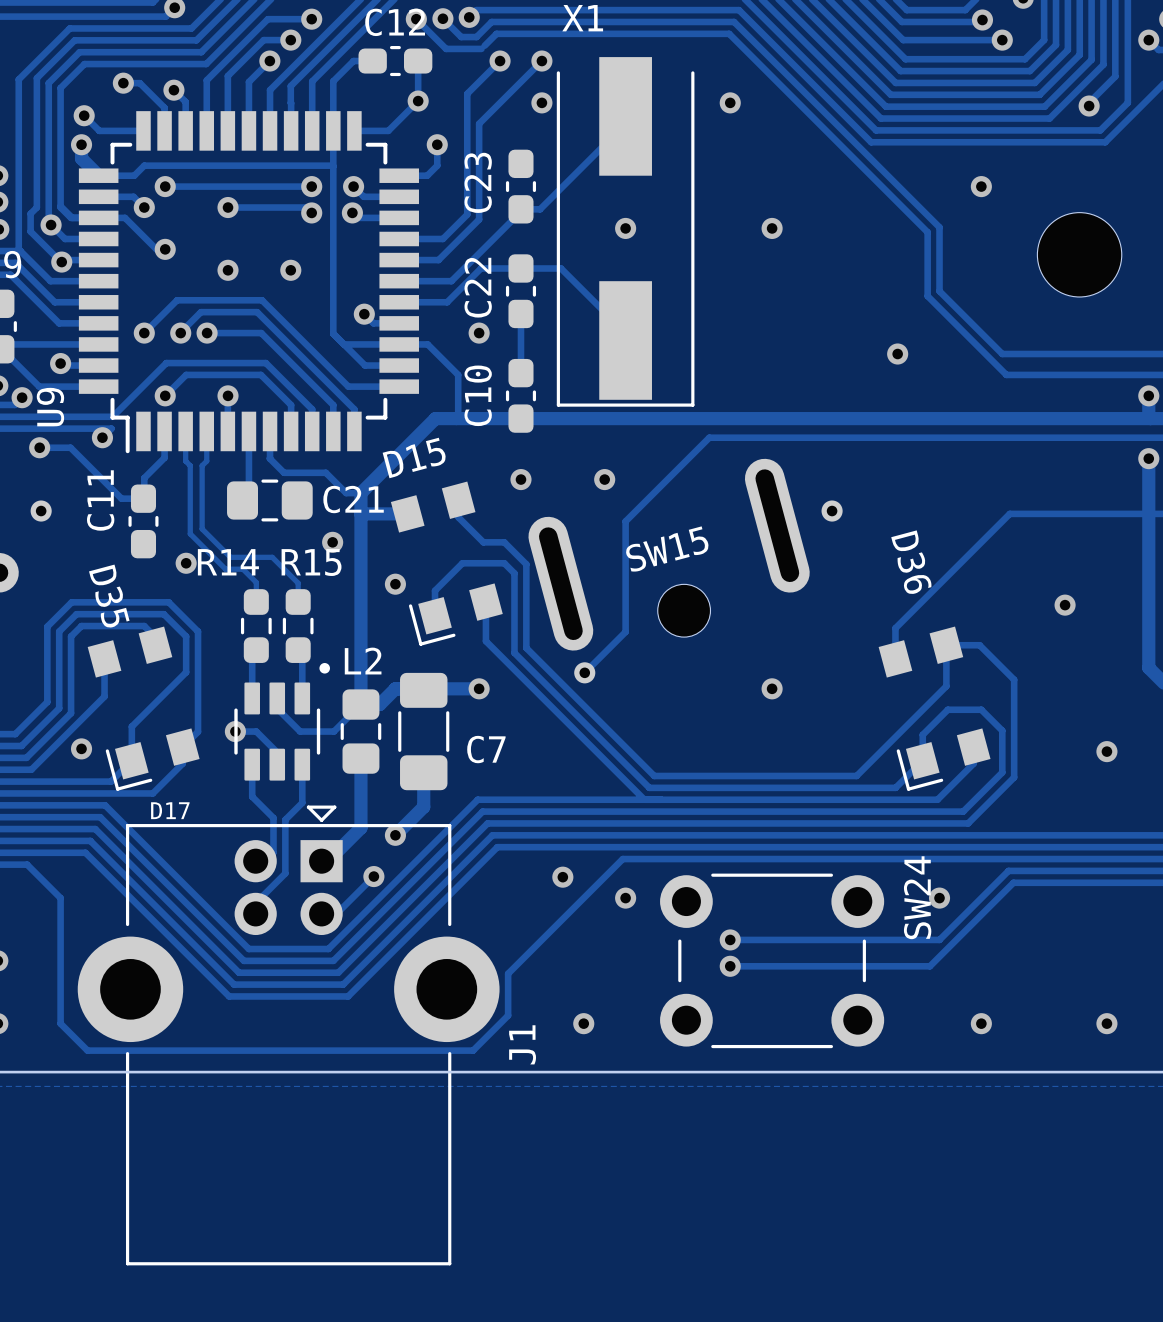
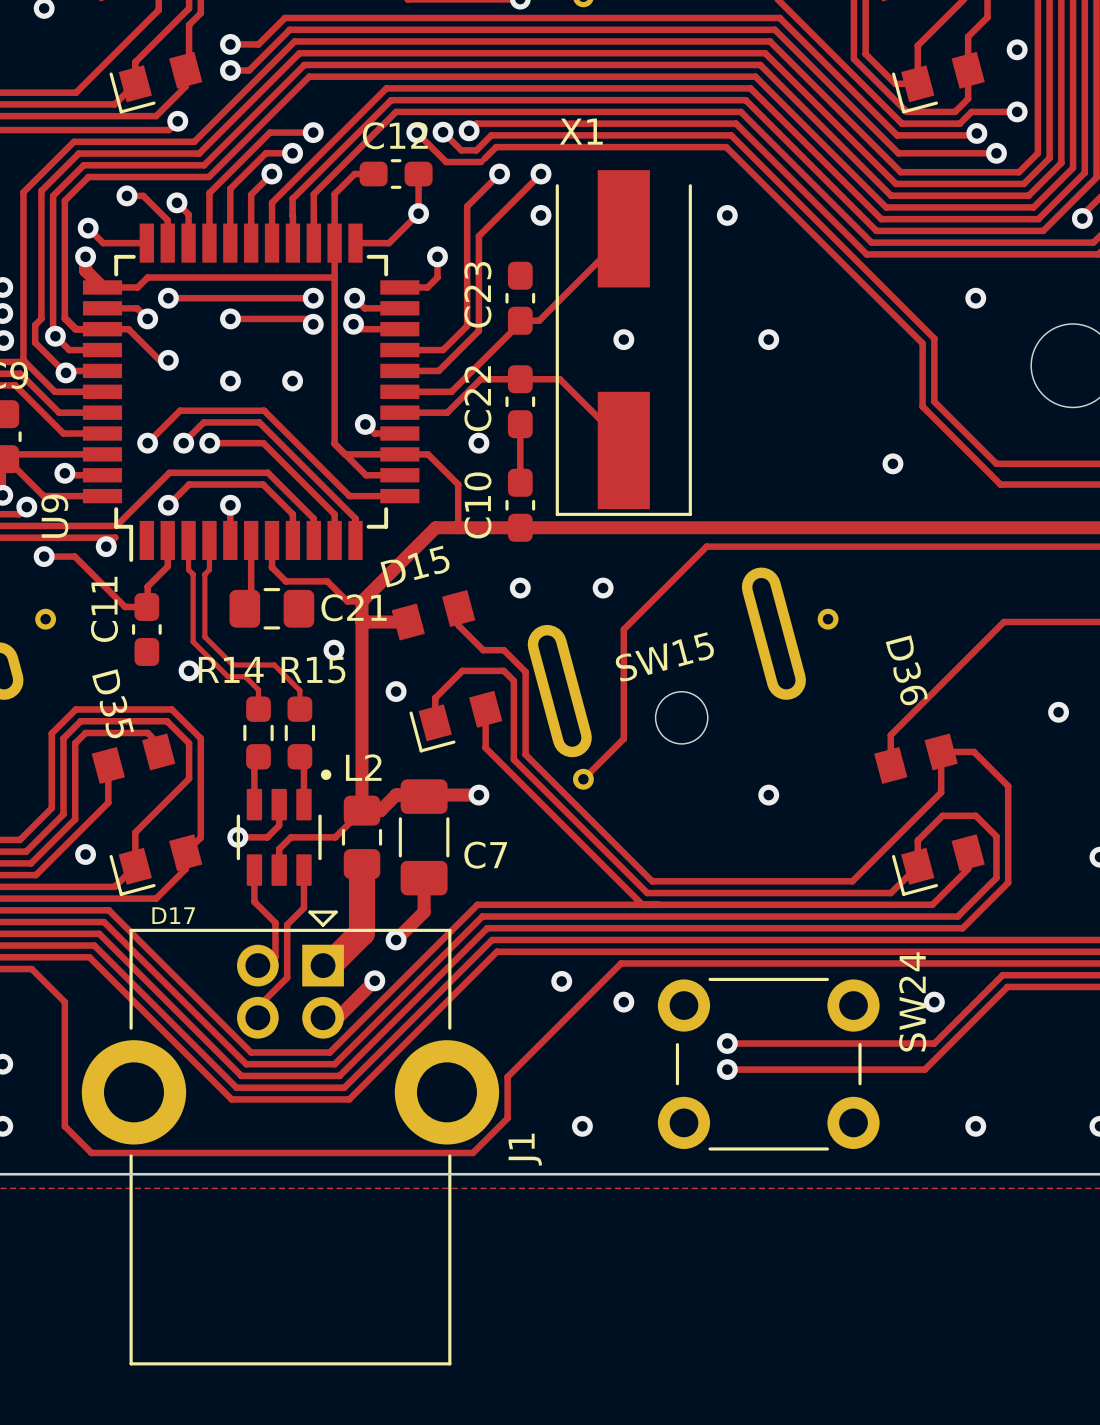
track: (277, 708) (300, 731) -> (279, 870) (279, 849) (290, 837) (301, 837)
track: (256, 731) (277, 752) -> (258, 837) (267, 837) (279, 825) (279, 804)
track width: thin (360, 758) (360, 827) (327, 861) -> thick (362, 864) (362, 932) (329, 965)
track width: thin (373, 876) (336, 913) -> thick (374, 980) (337, 1017)

